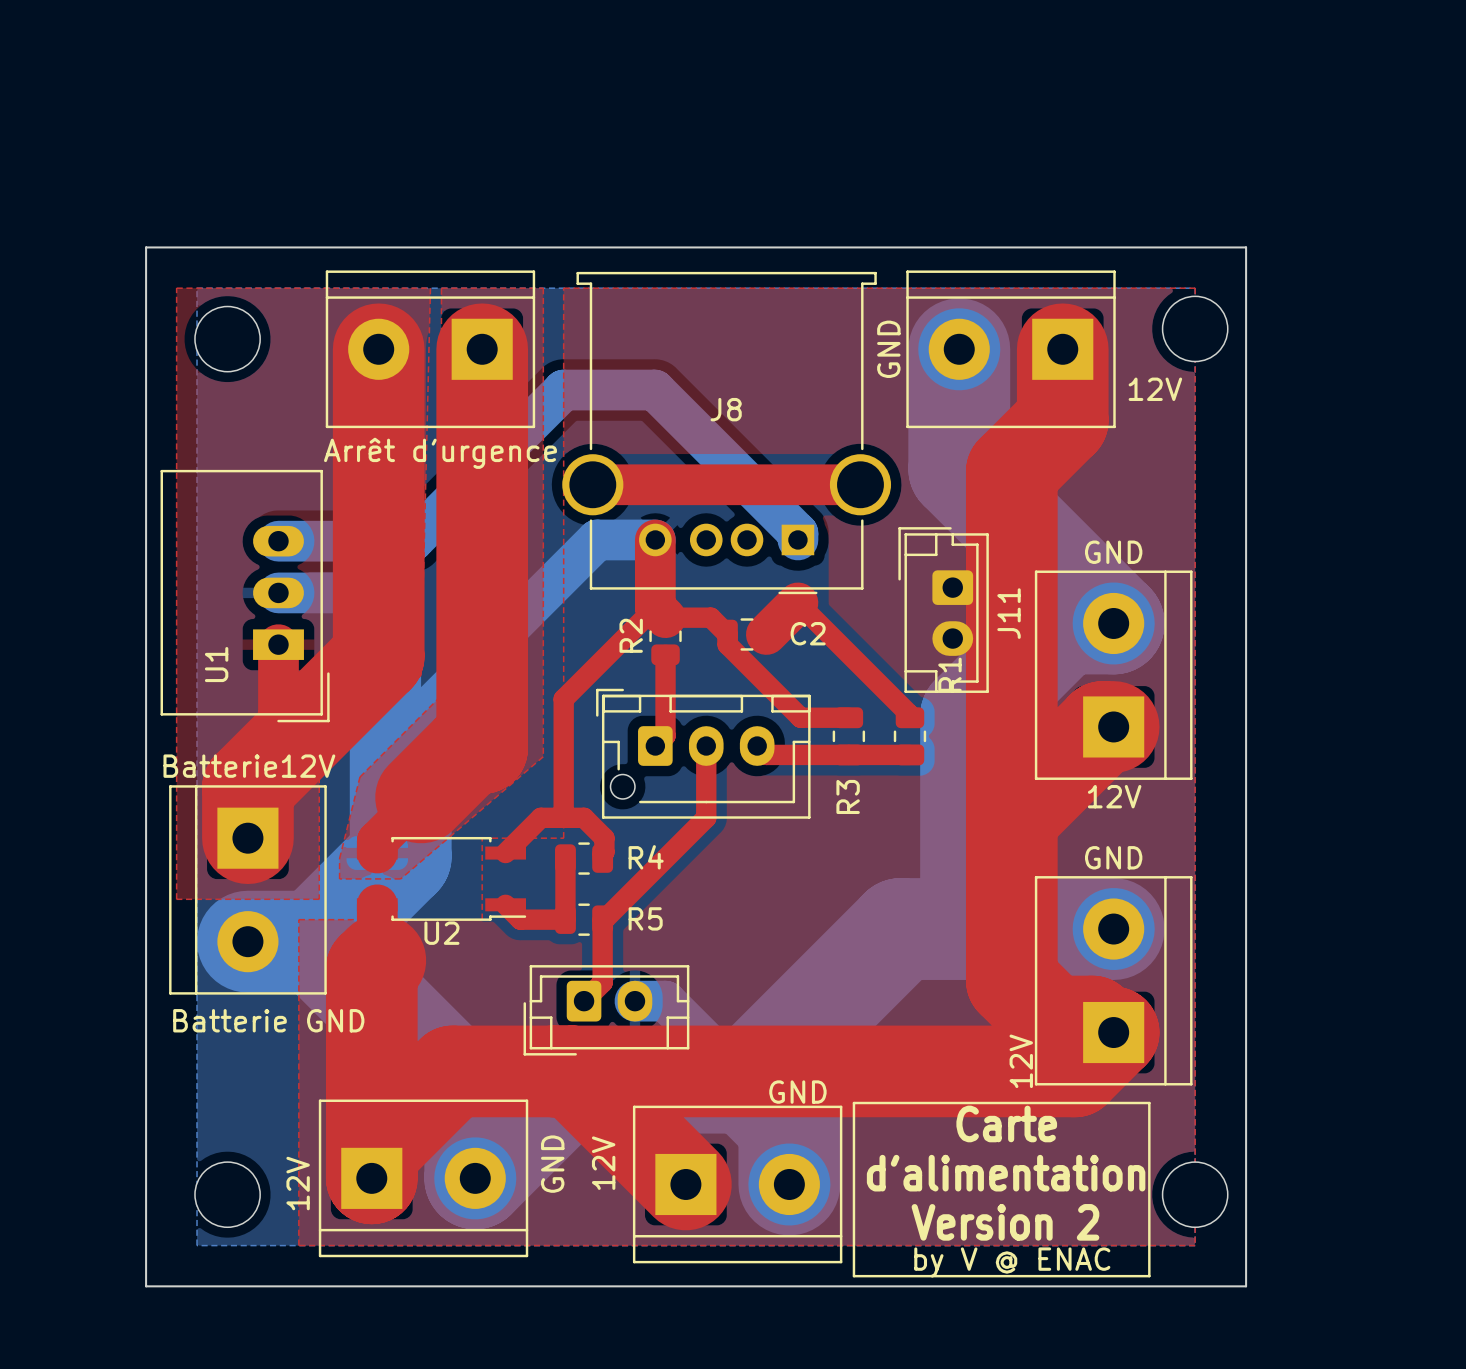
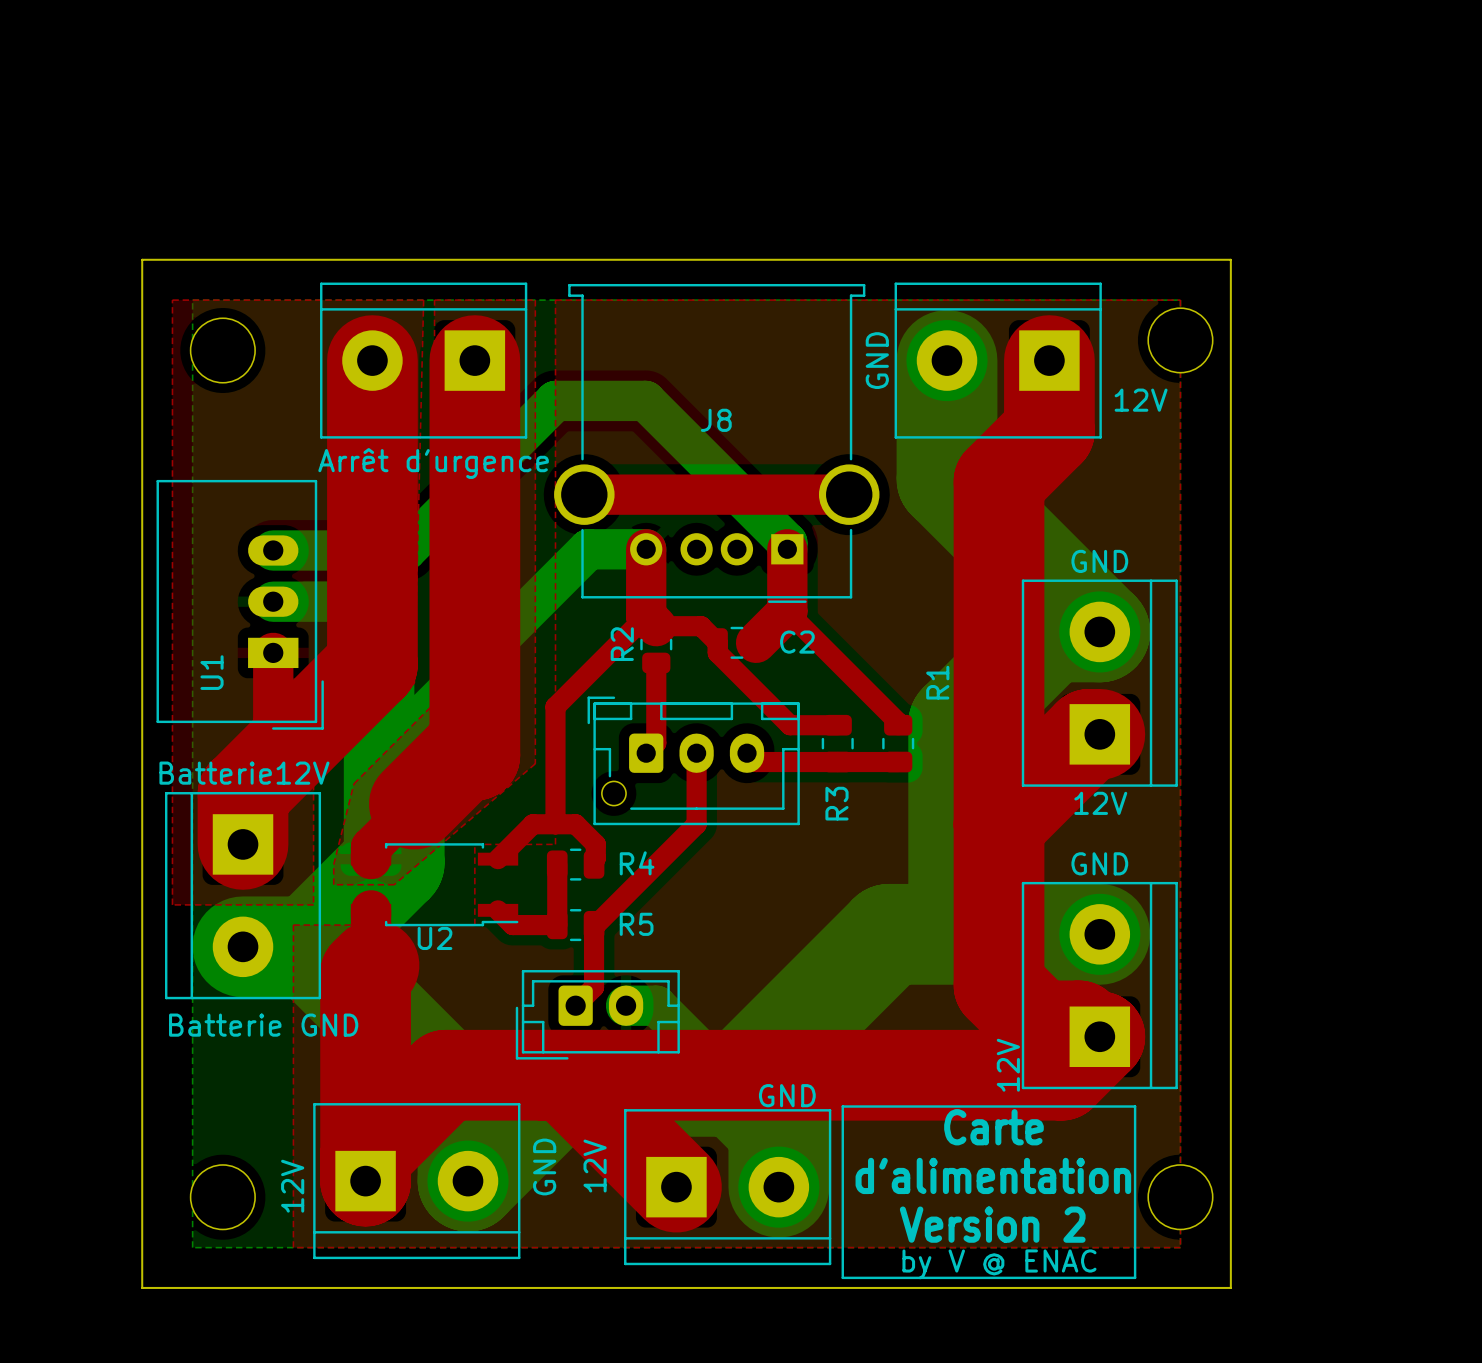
top track: none -> (787, 549) (787, 611)
J11: (943, 610) -> none

